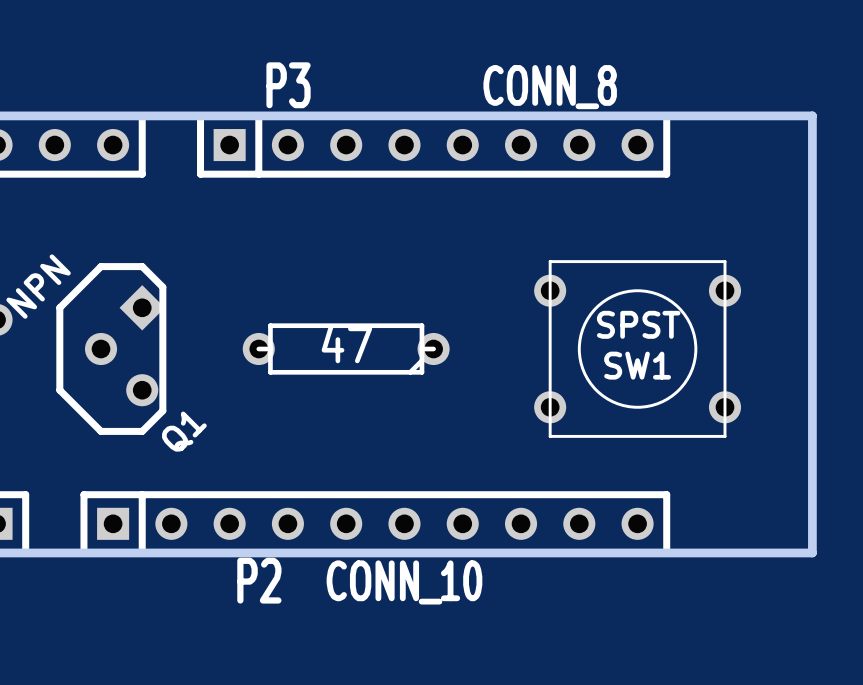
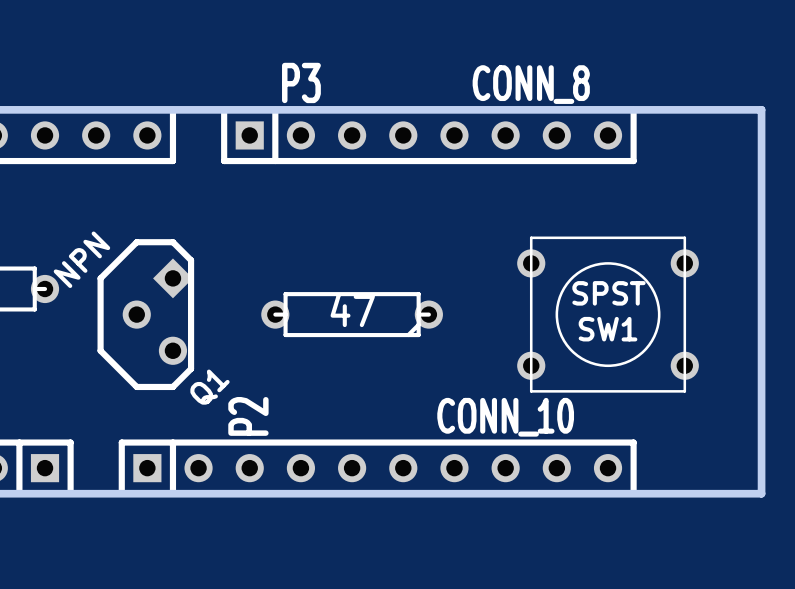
P2 name rotation: 0° (259, 580) -> 90° counterclockwise (248, 416)
P2 name position: P2 (259, 580) -> P2 (248, 416)
P2 value position: CONN_10 (404, 582) -> CONN_10 (505, 417)

